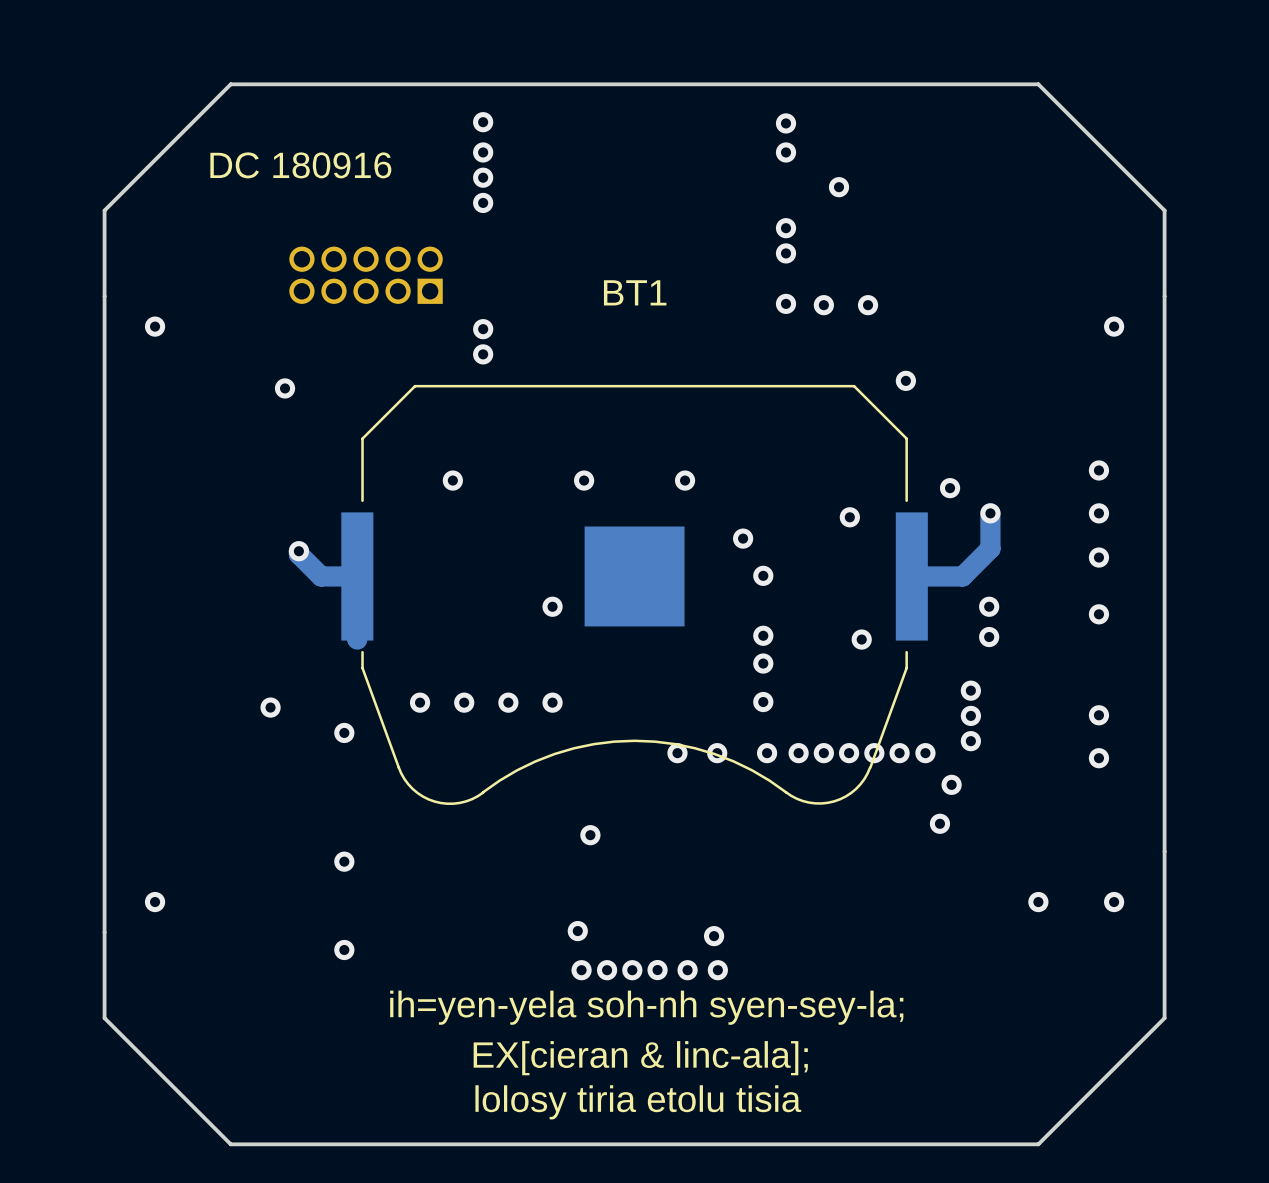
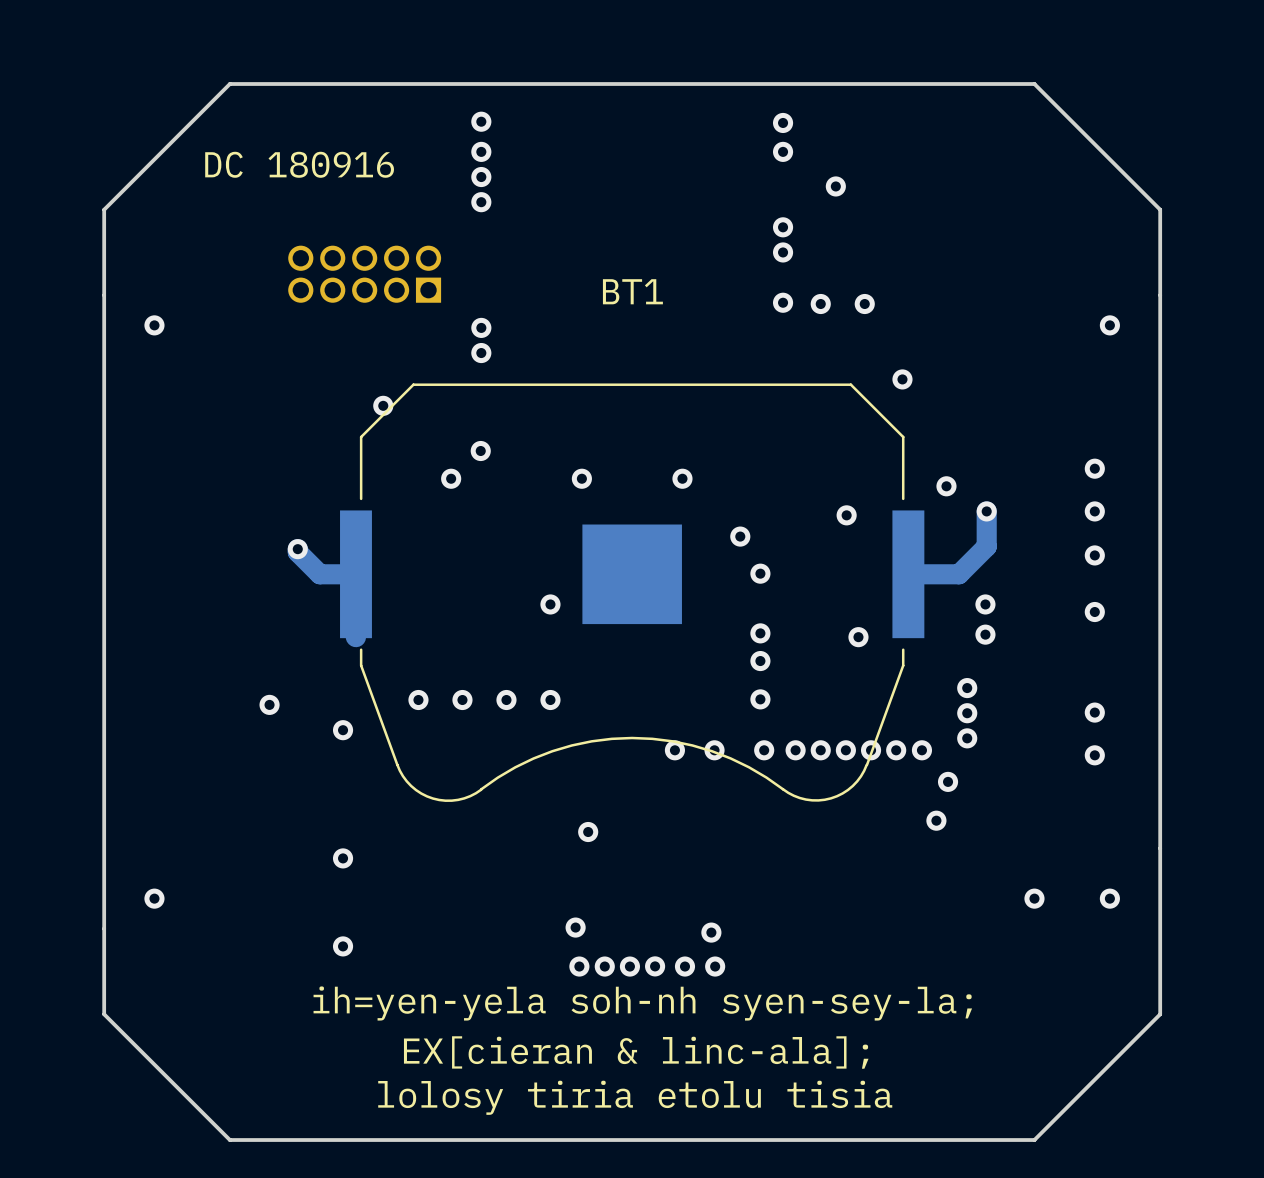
via position: (285, 388) -> (383, 405)
via: none -> (480, 451)

